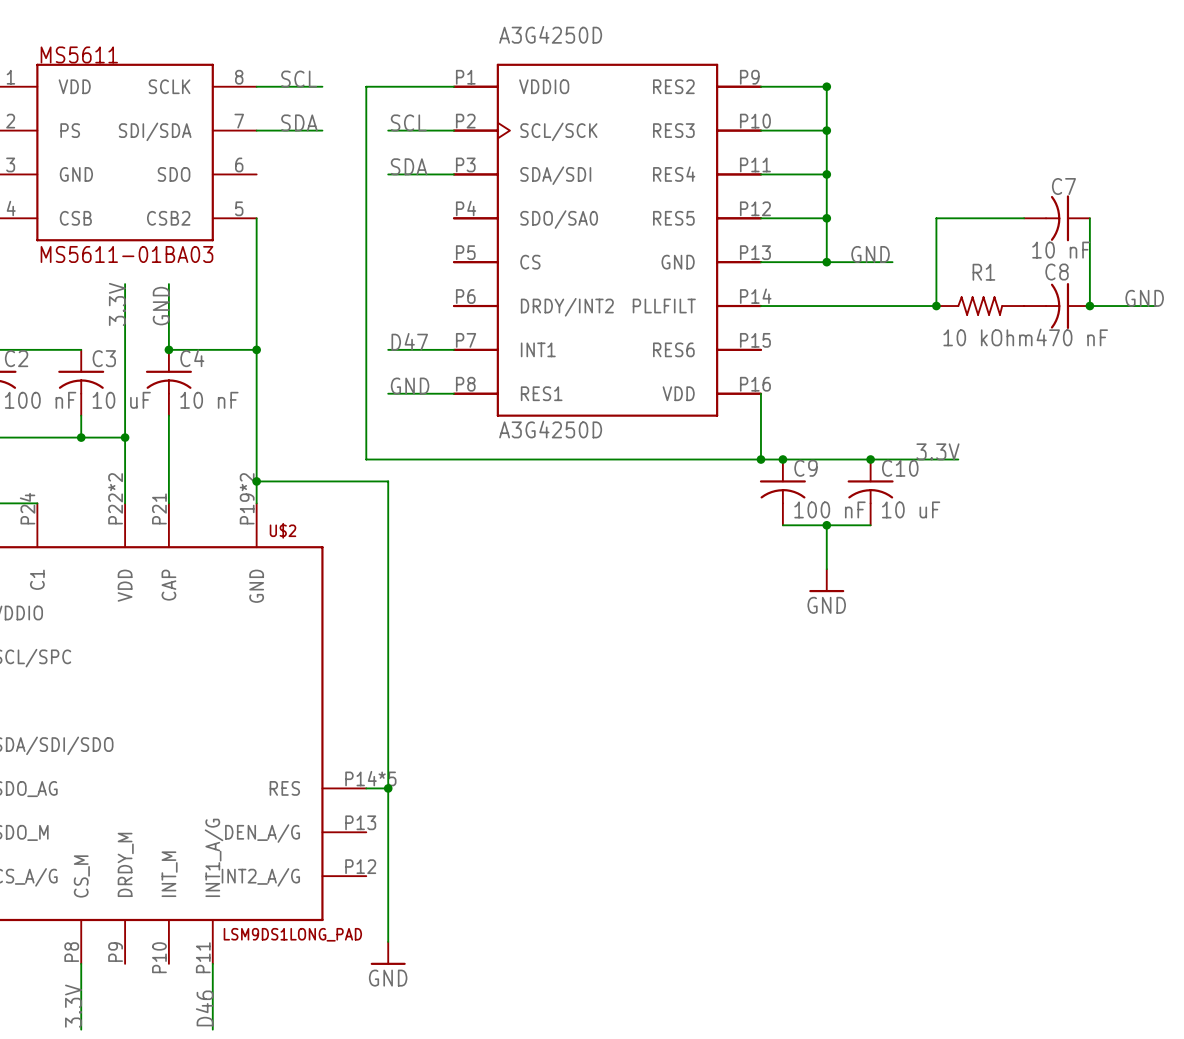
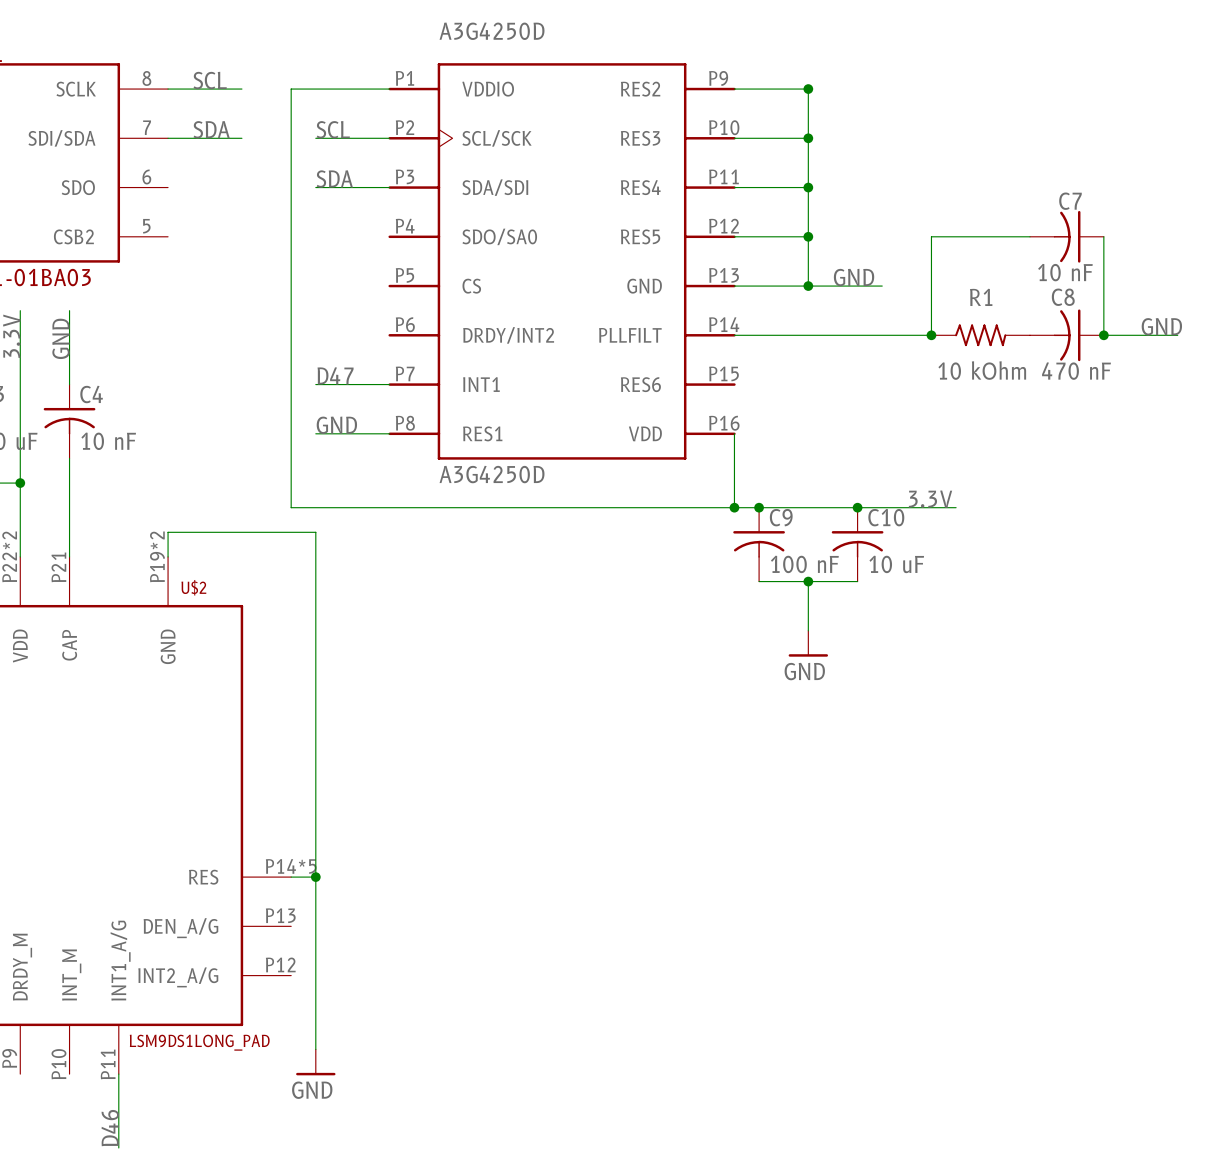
wire: (256, 218) (256, 481) -> none
wire: (168, 349) (256, 349) -> none
junction: (168, 349) -> none
junction: (256, 349) -> none
junction: (256, 481) -> none

